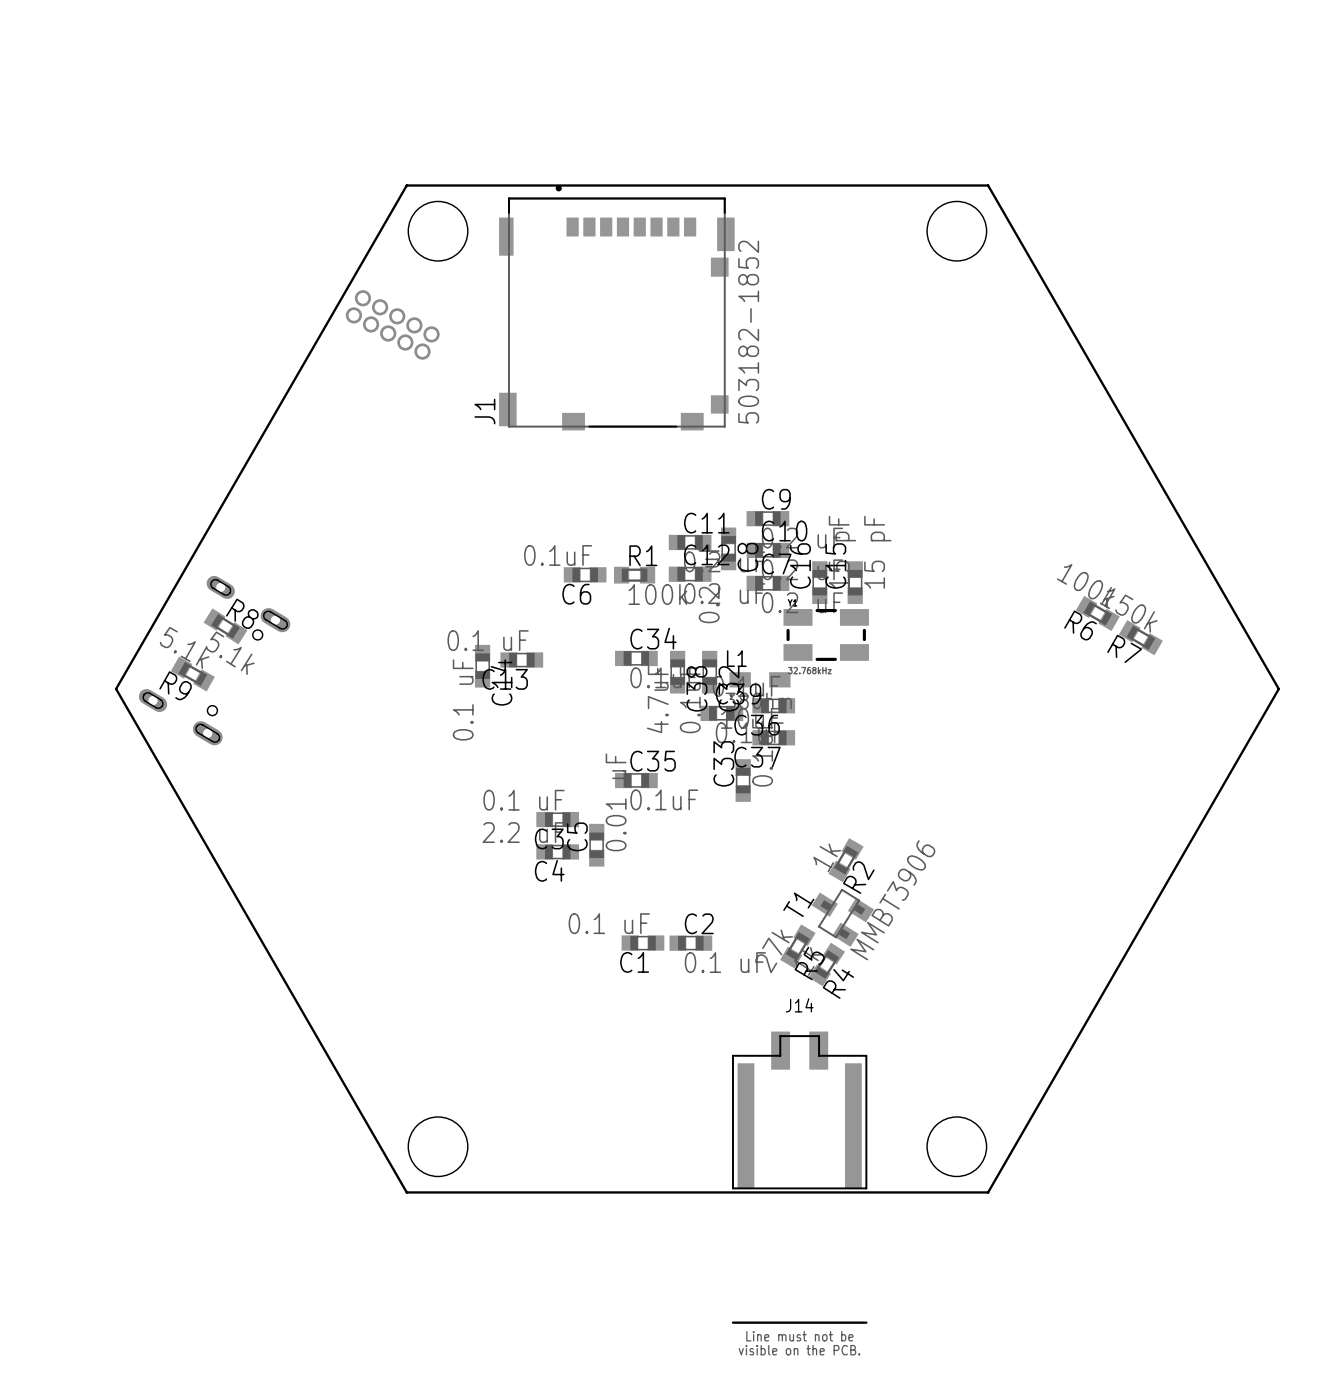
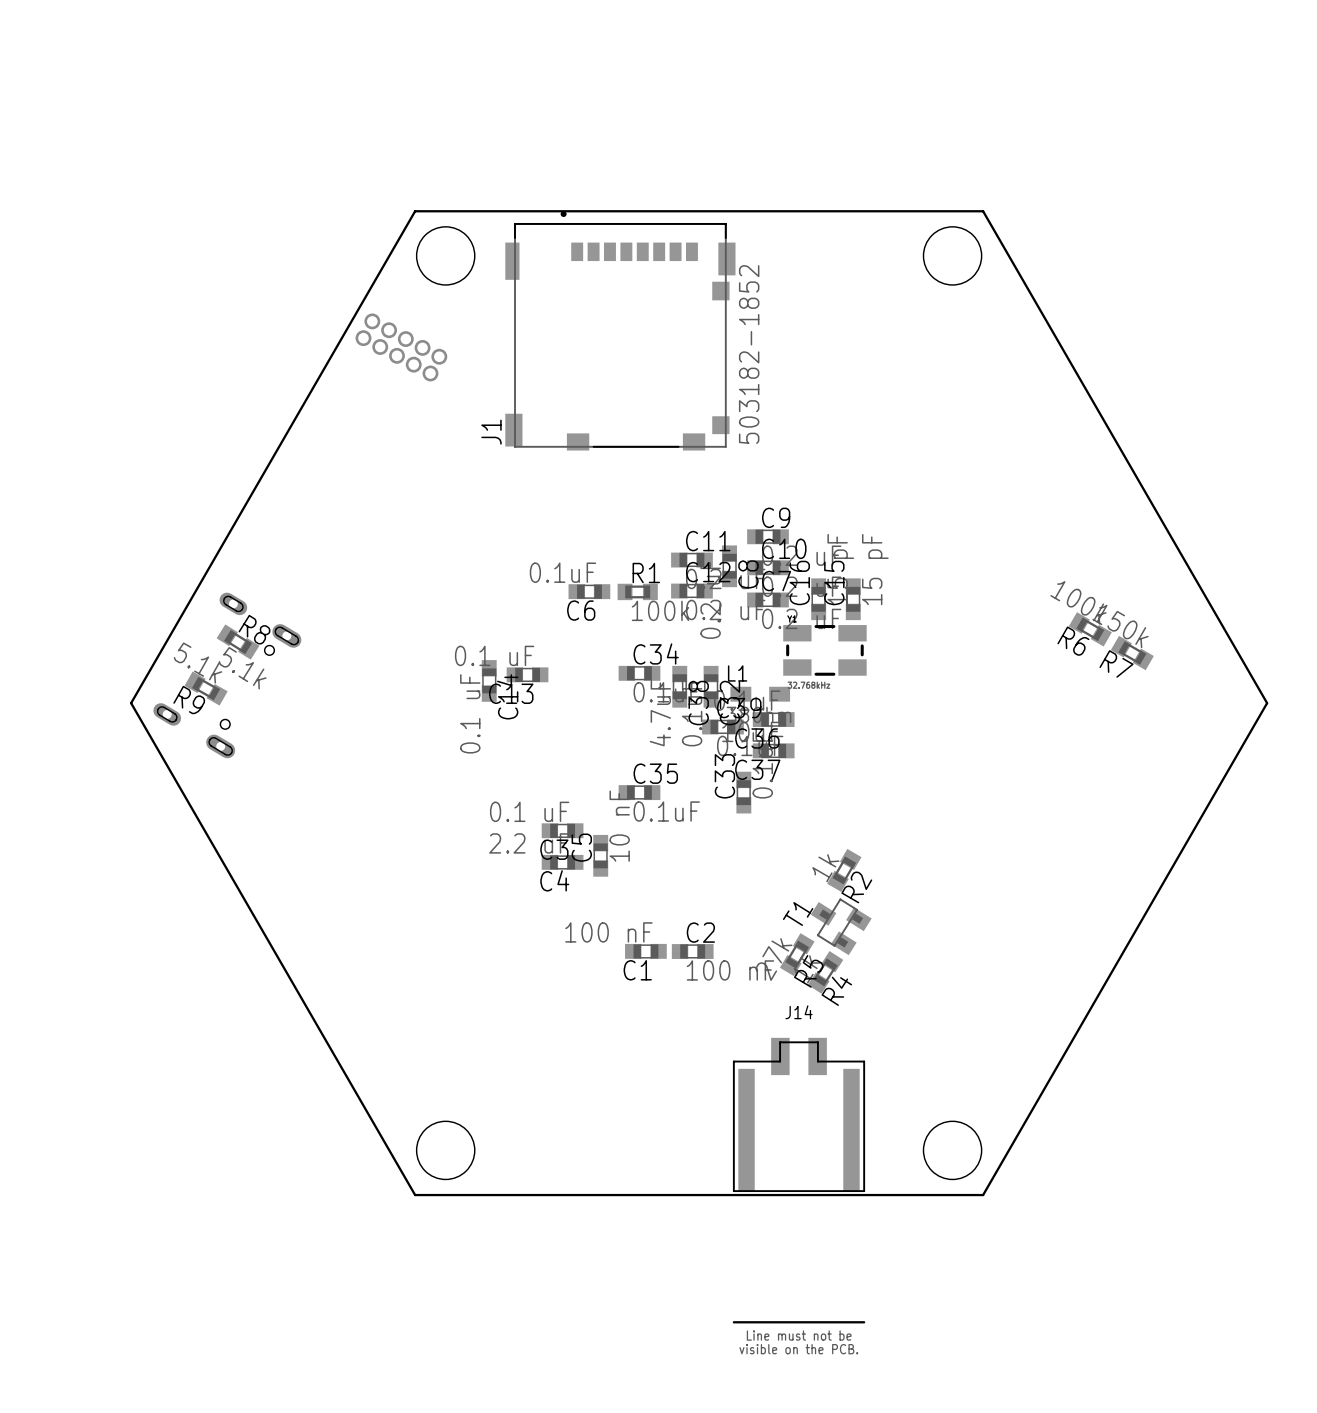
C5 value: 0.01 uF (616, 802) -> 10 nF (619, 826)
T1 value: MMBT3906 (892, 900) -> none
C1 value: 0.1 uF (609, 923) -> 100 nF (608, 932)
C2 value: 0.1 uF (725, 962) -> 100 nF (730, 970)

